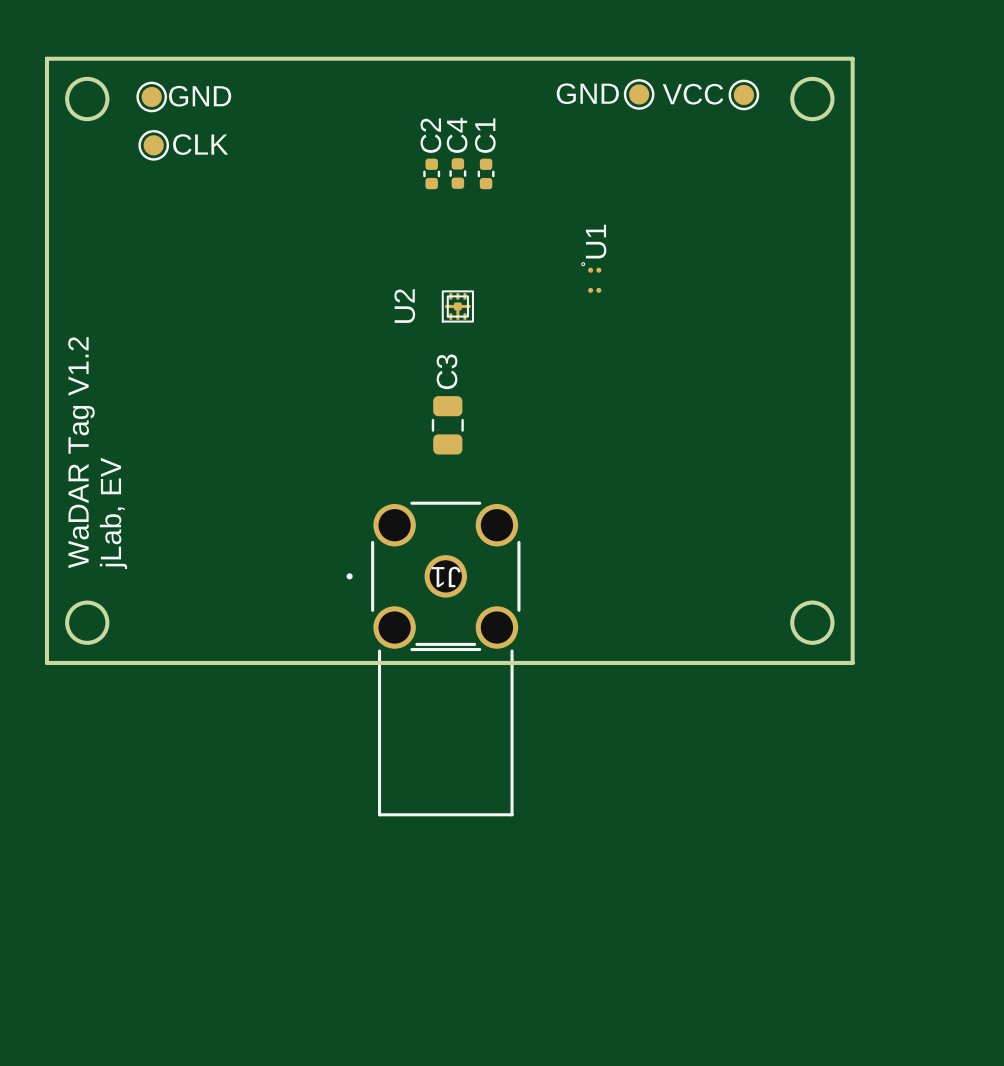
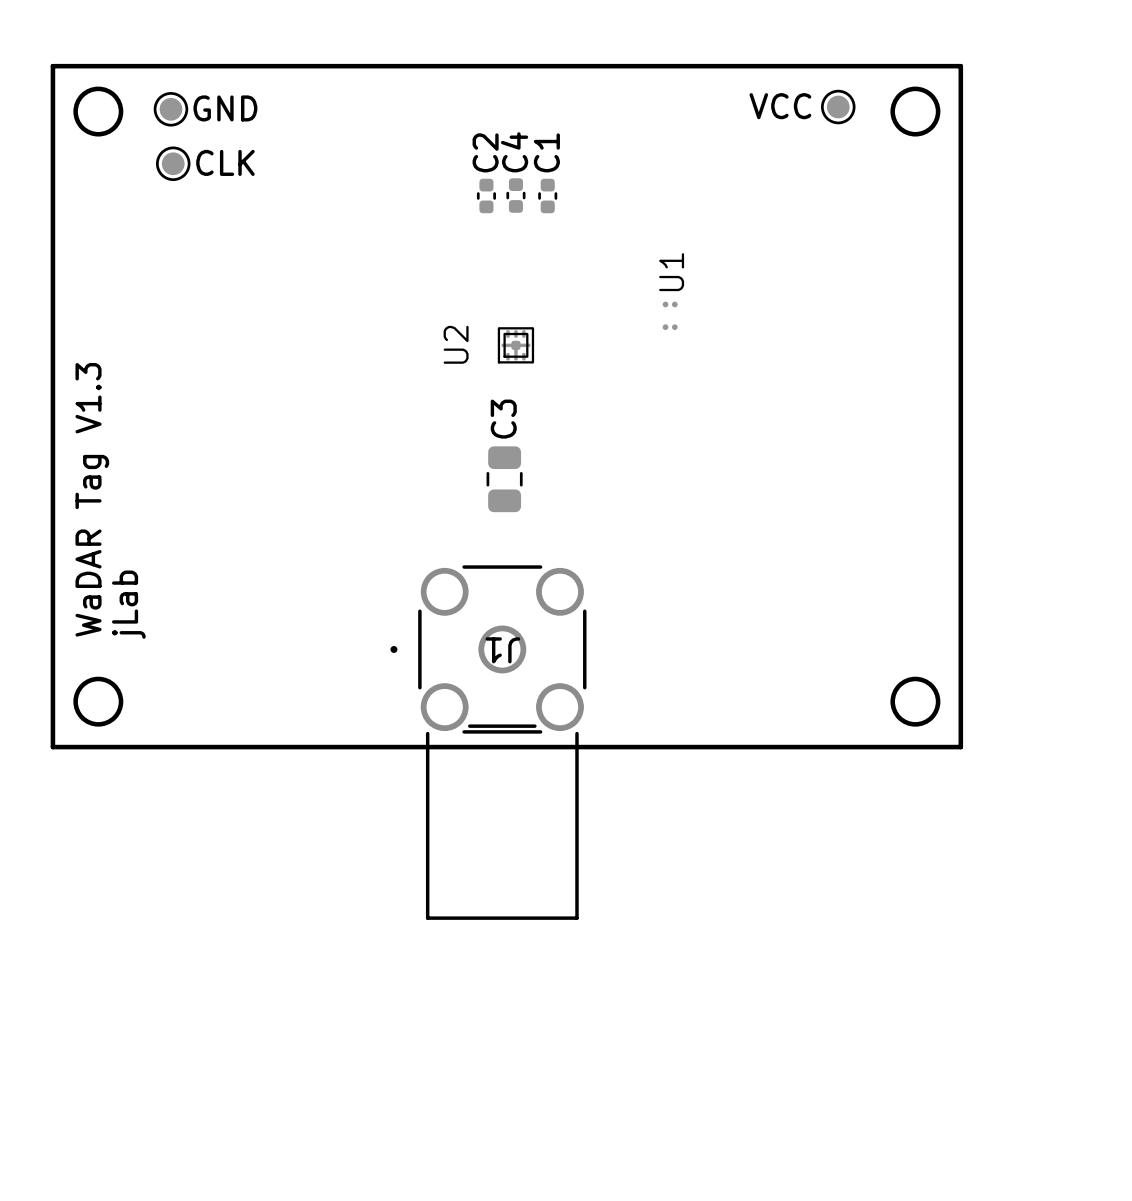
GND: (639, 94) -> none
drawing: [581, 262, 586, 267] -> none
text: WaDAR Tag V1.2 (81, 452) -> WaDAR Tag V1.3 (92, 499)
text: jLab, EV (113, 513) -> jLab (128, 604)

